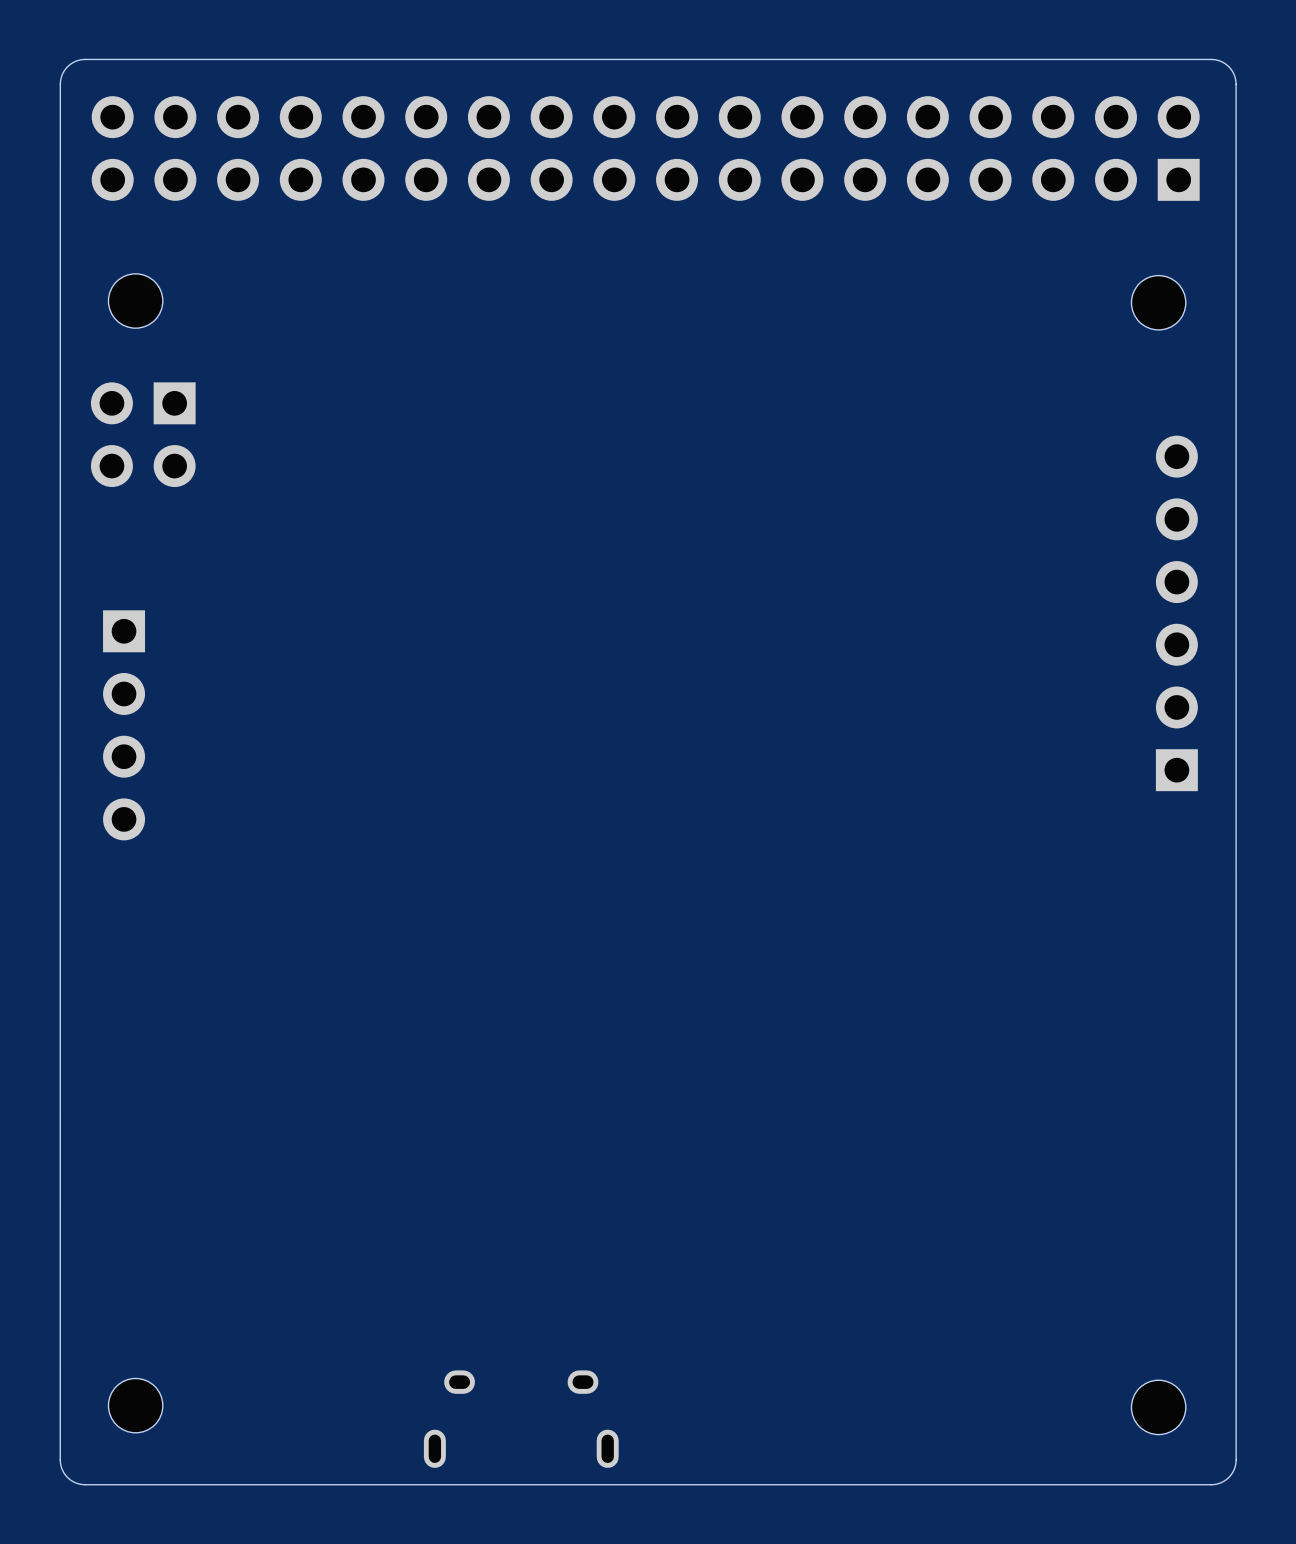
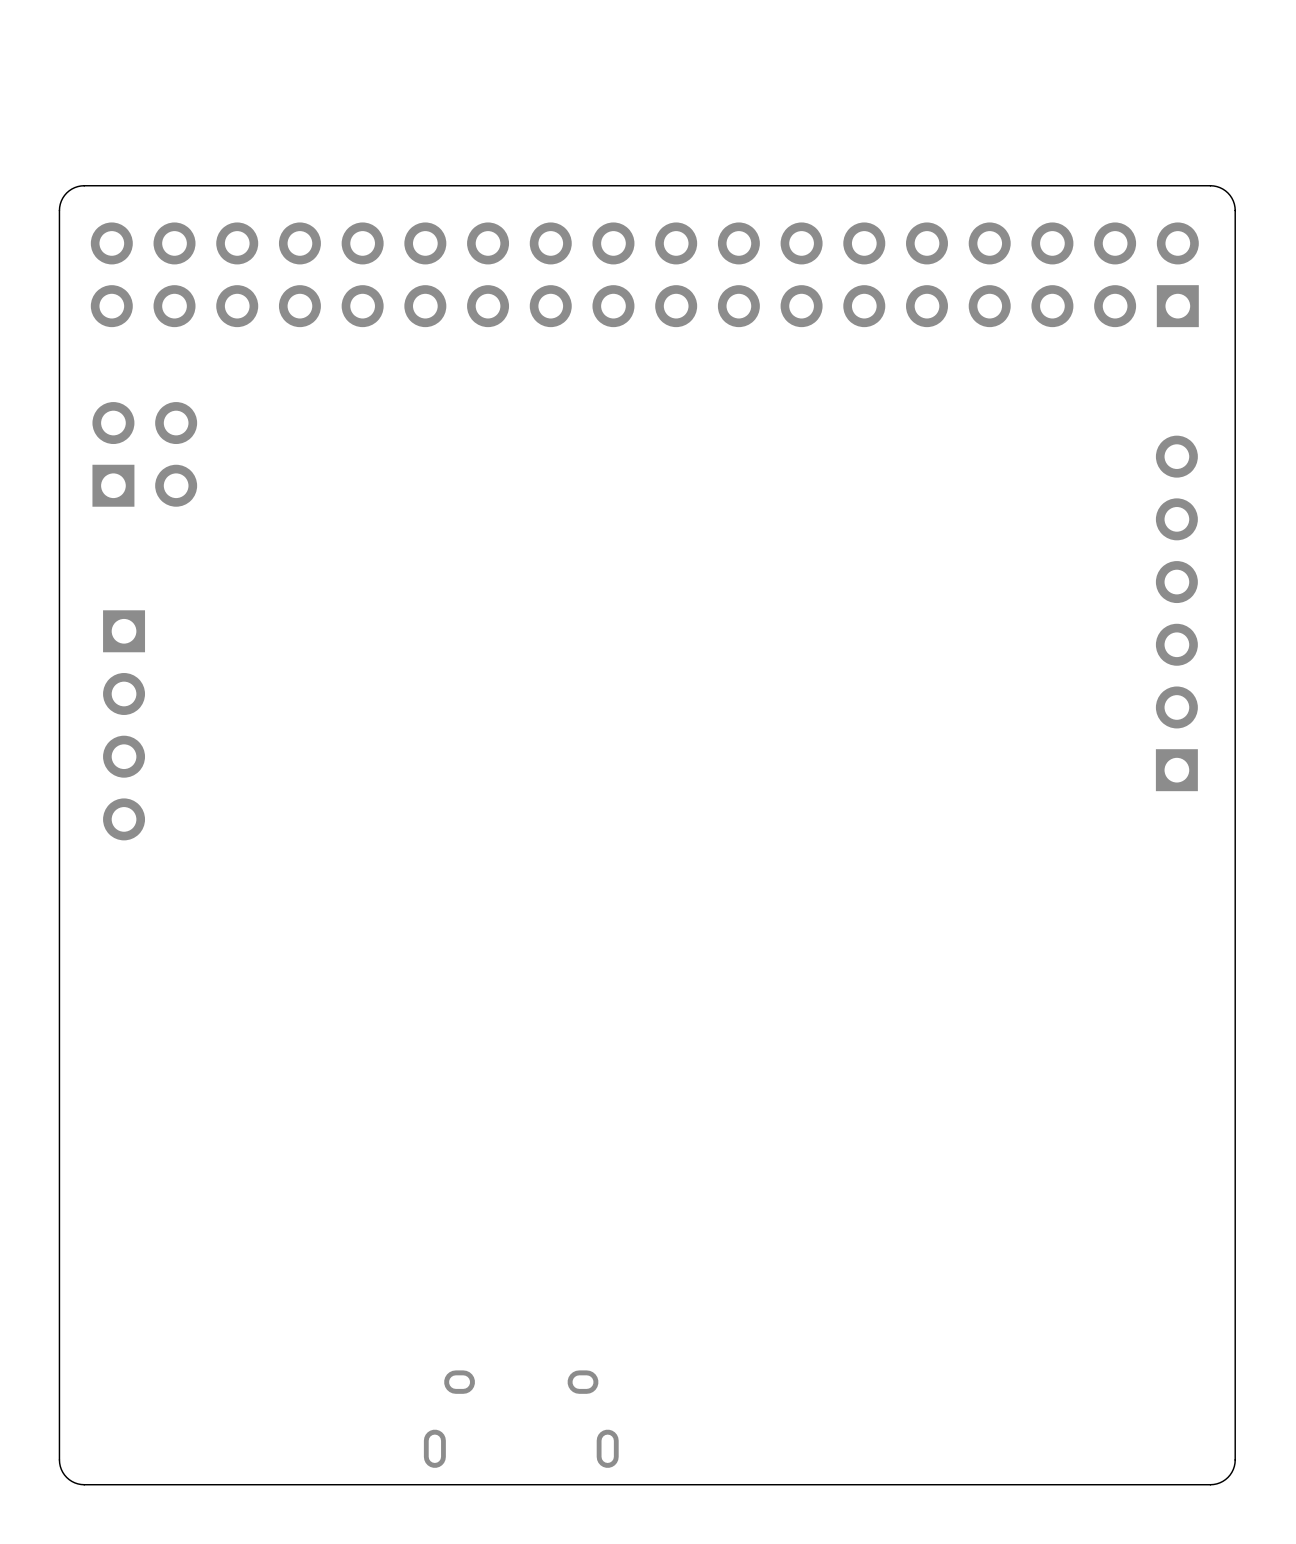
part position: (645, 148) -> (644, 274)
part: (135, 301) -> none
part: (1158, 302) -> none
part rotation: 0° (143, 434) -> 180° (144, 454)
part: (135, 1405) -> none
part: (1158, 1407) -> none
board edge: (1210, 1484) (1220, 1482) (1228, 1477) (1234, 1469) (1236, 1459) (1236, 84) (1234, 74) (1228, 66) (1220, 61) (1211, 59) (85, 59) (72, 62) (65, 69) (60, 84) (60, 1459) (62, 1469) (67, 1477) (75, 1482) (85, 1484) -> (1210, 1484) (1219, 1482) (1227, 1477) (1233, 1469) (1235, 1459) (1235, 210) (1230, 195) (1222, 189) (1210, 185) (84, 185) (74, 187) (66, 193) (61, 201) (59, 210) (59, 1459) (61, 1469) (66, 1477) (74, 1482) (85, 1484)

